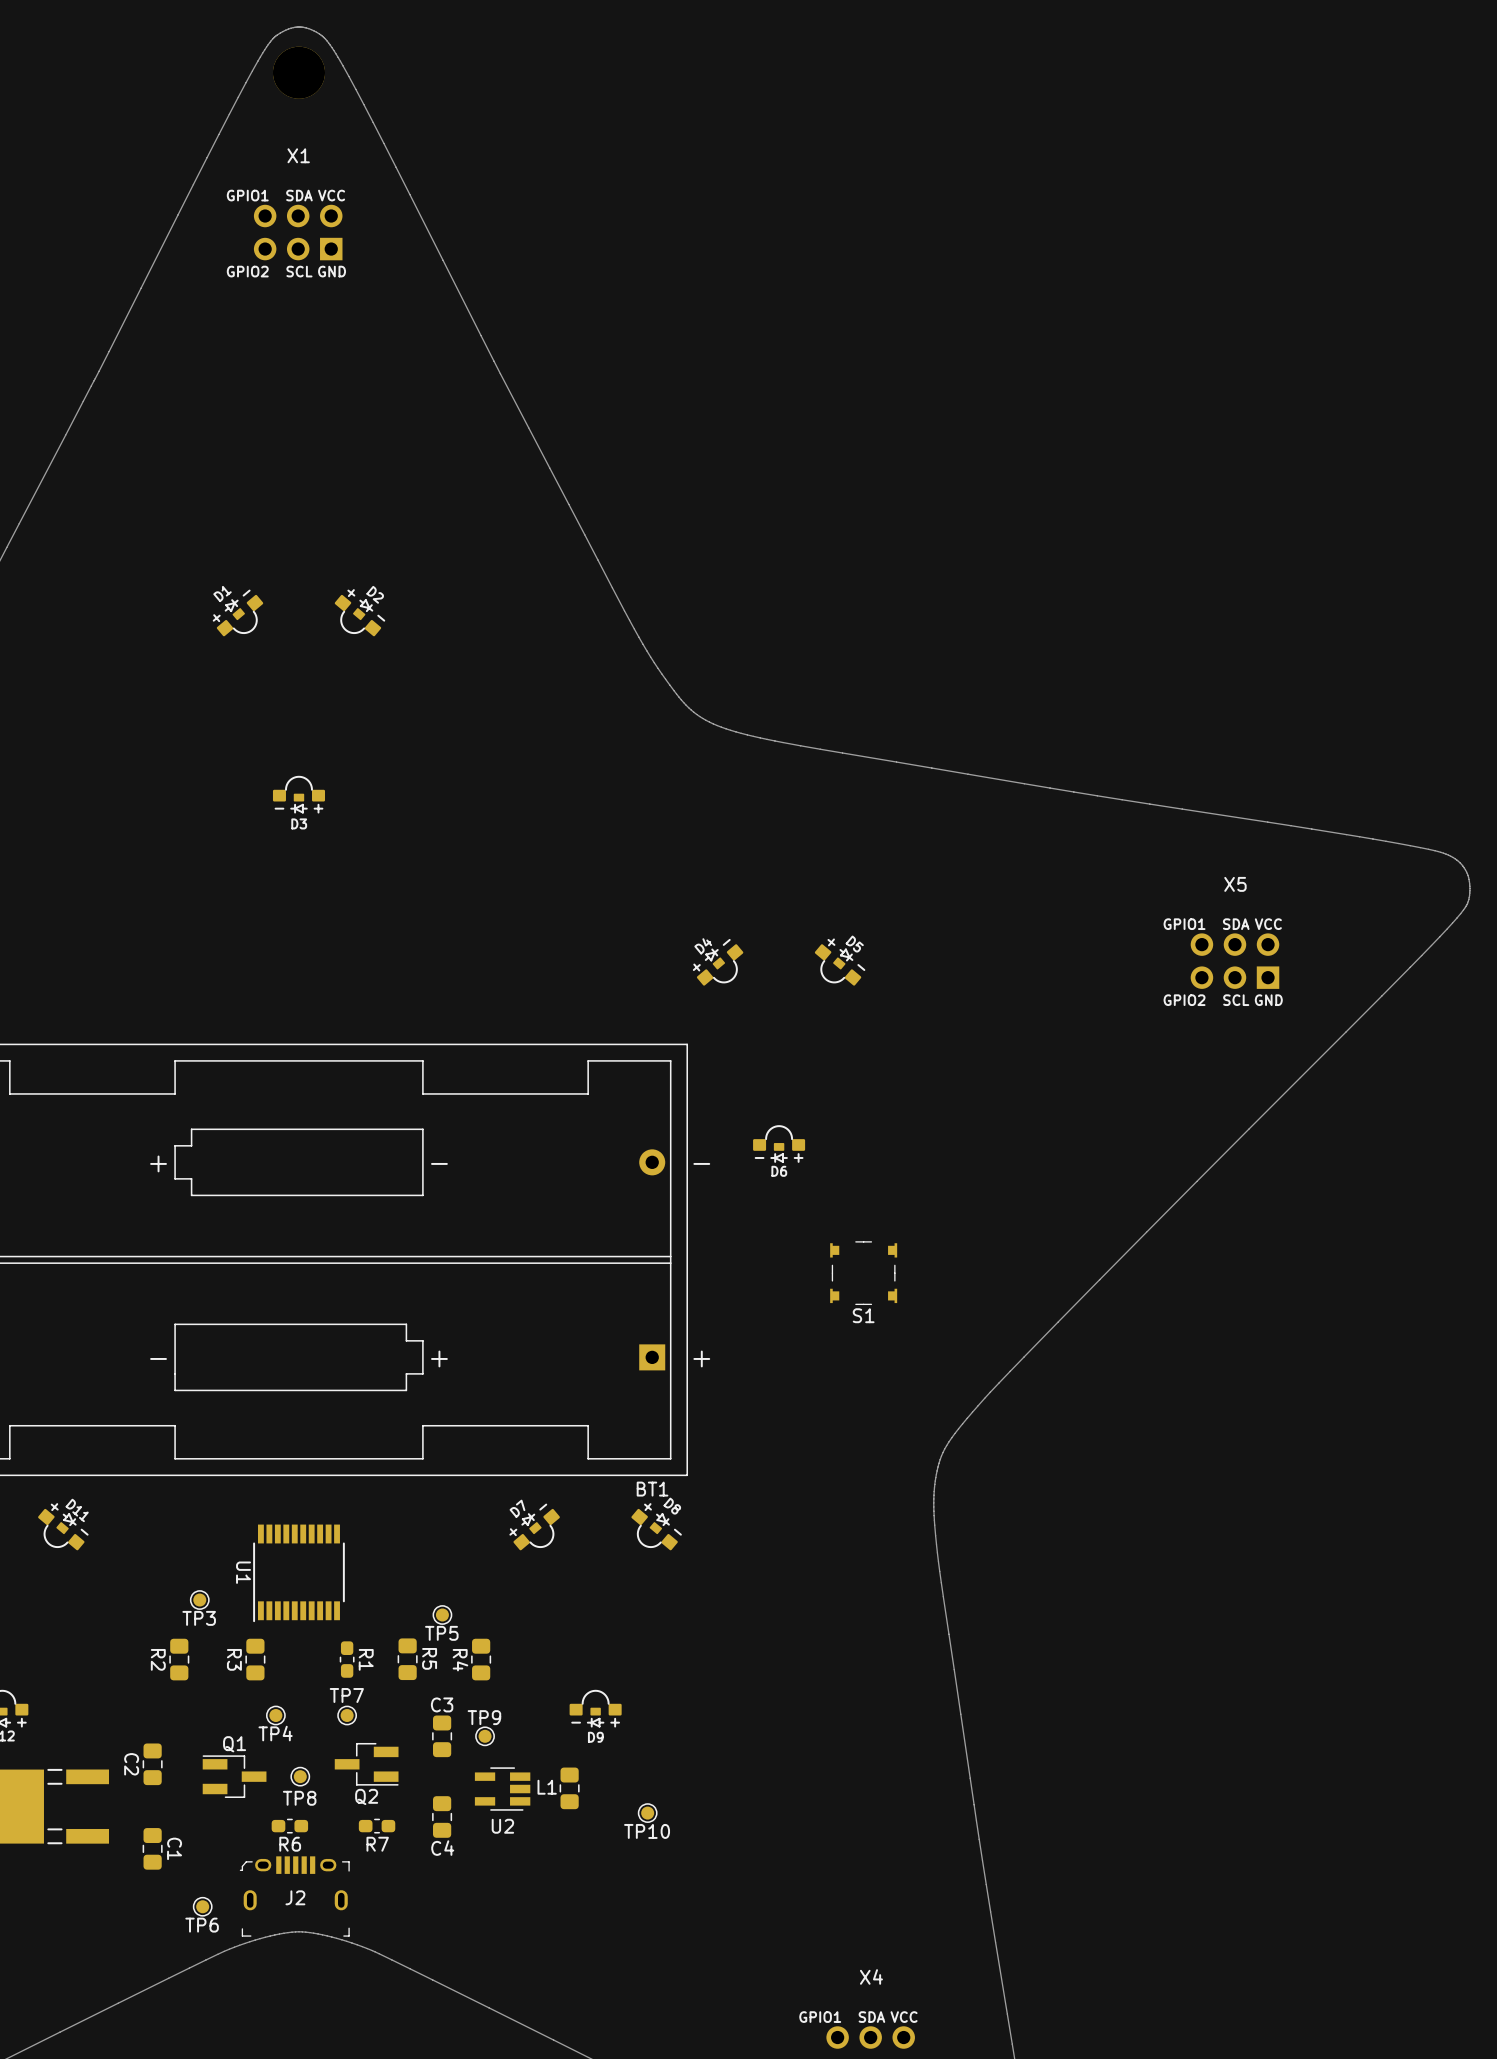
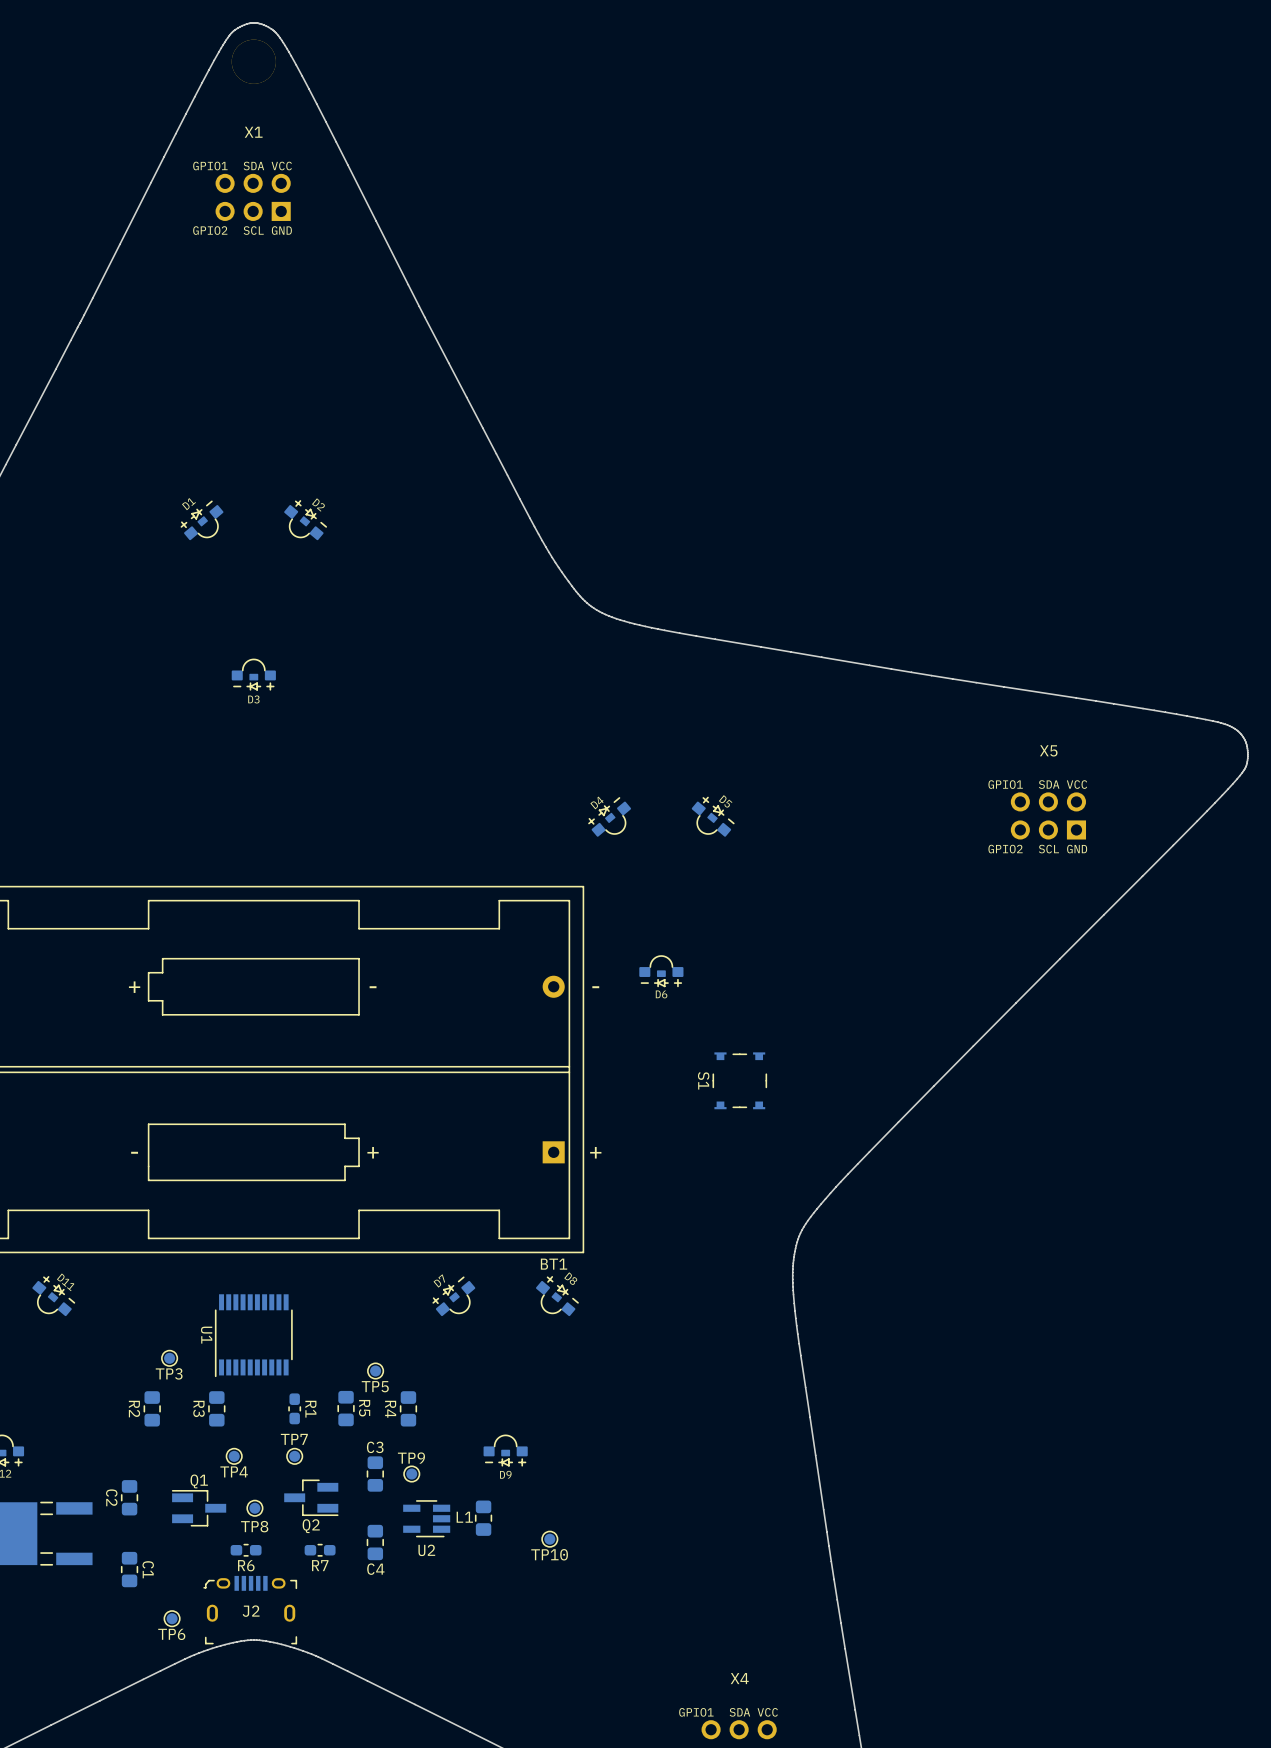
S1 rotation: 0° (863, 1273) -> 90° clockwise (739, 1080)

